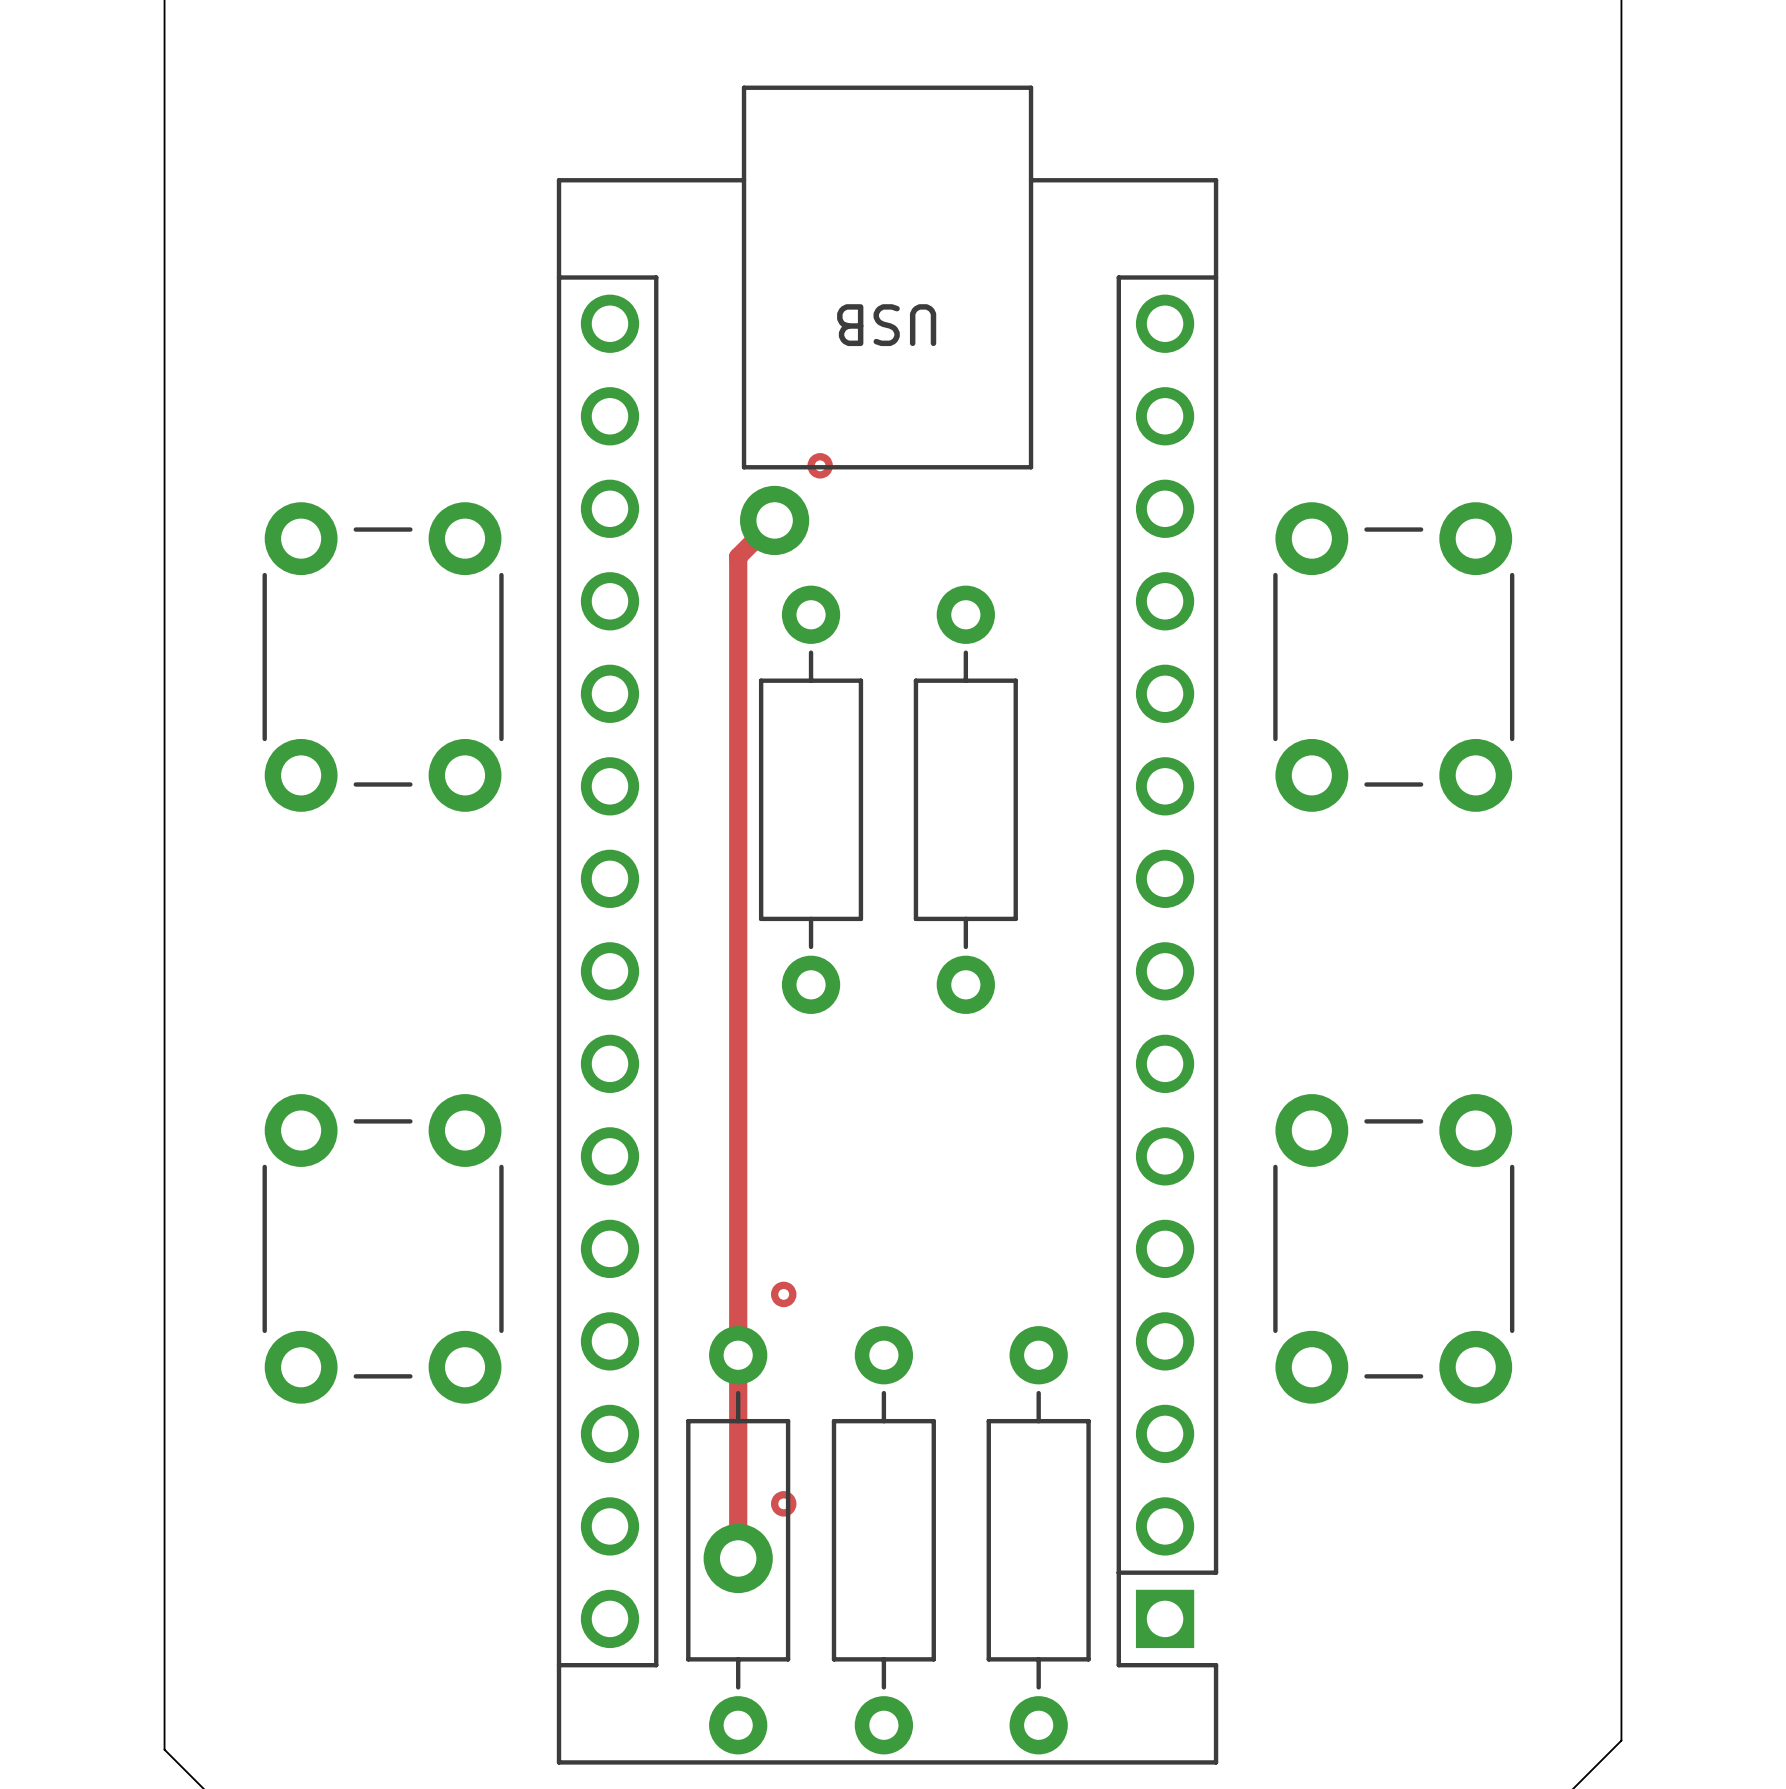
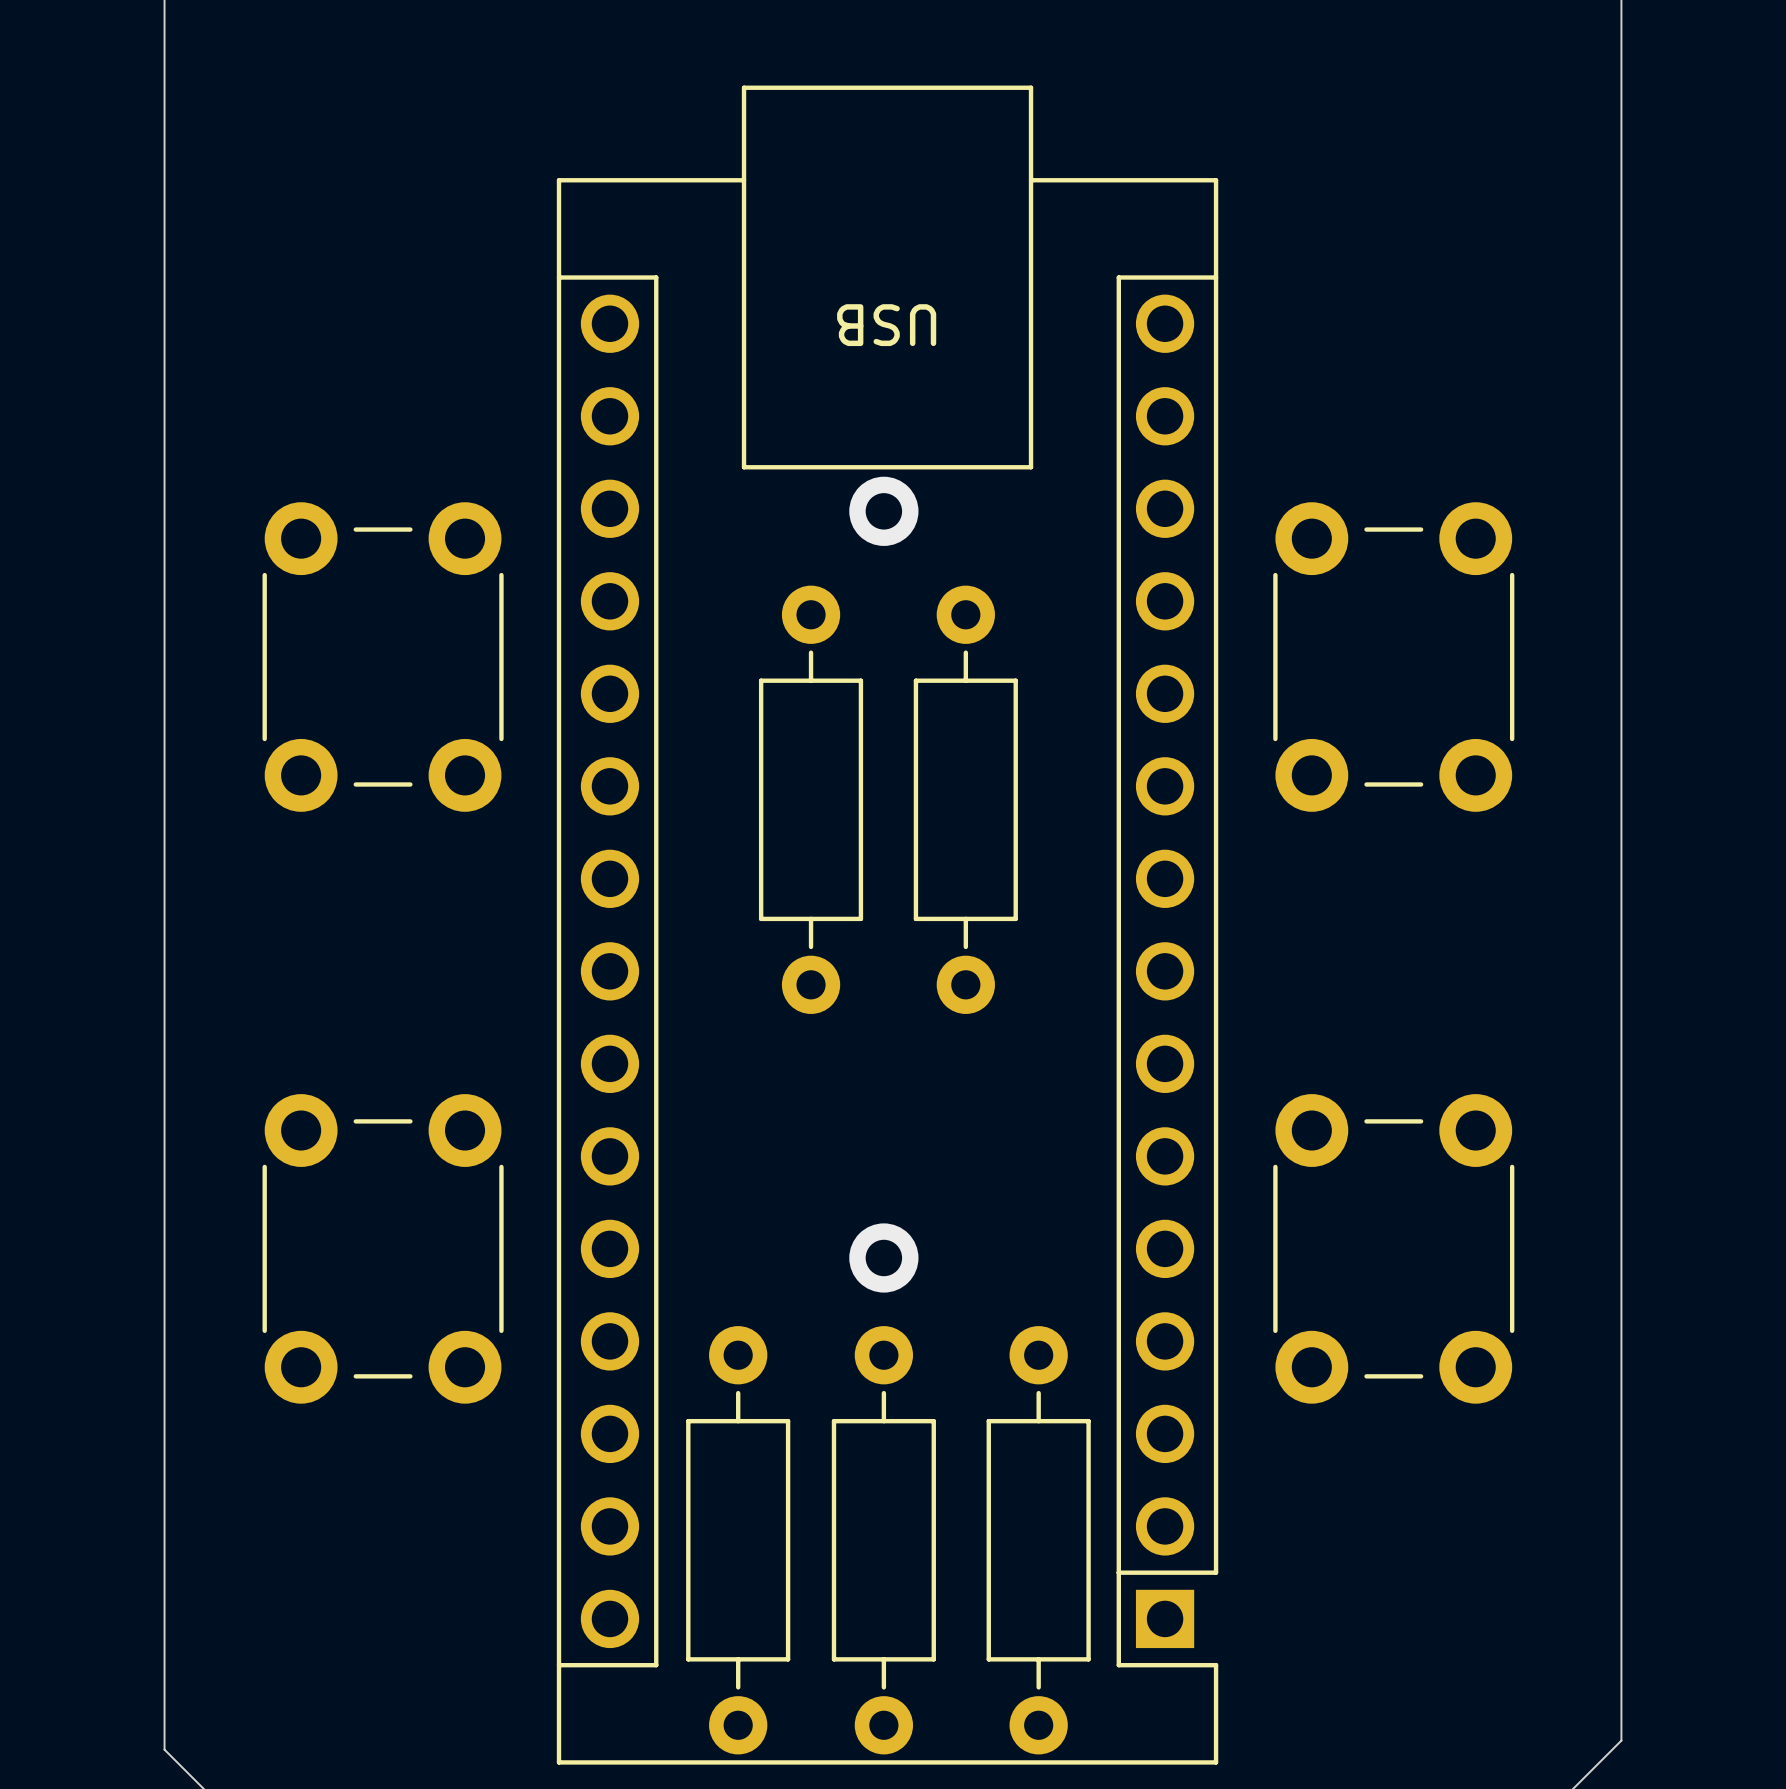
drawing: [807, 453, 833, 479] -> none
track: (774, 520) (738, 556) (738, 1558) -> none
via position: (774, 520) -> (883, 511)
via: none -> (883, 1257)
drawing: [770, 1281, 797, 1308] -> none
drawing: [770, 1491, 797, 1517] -> none
via: (738, 1558) -> none

